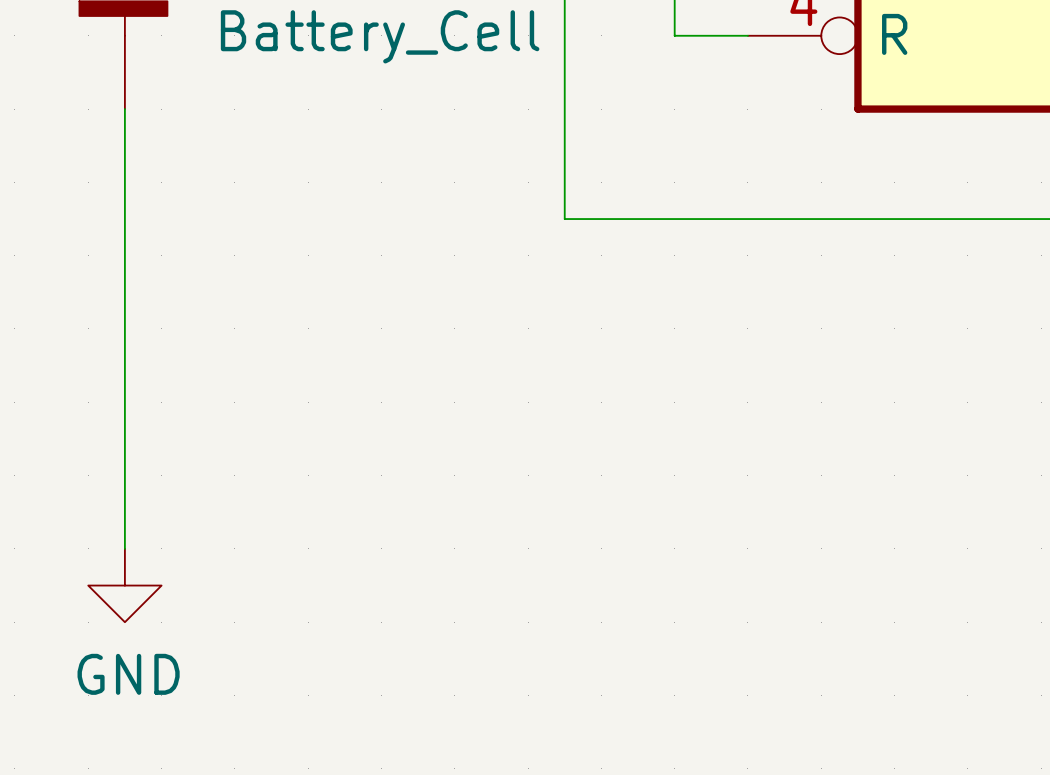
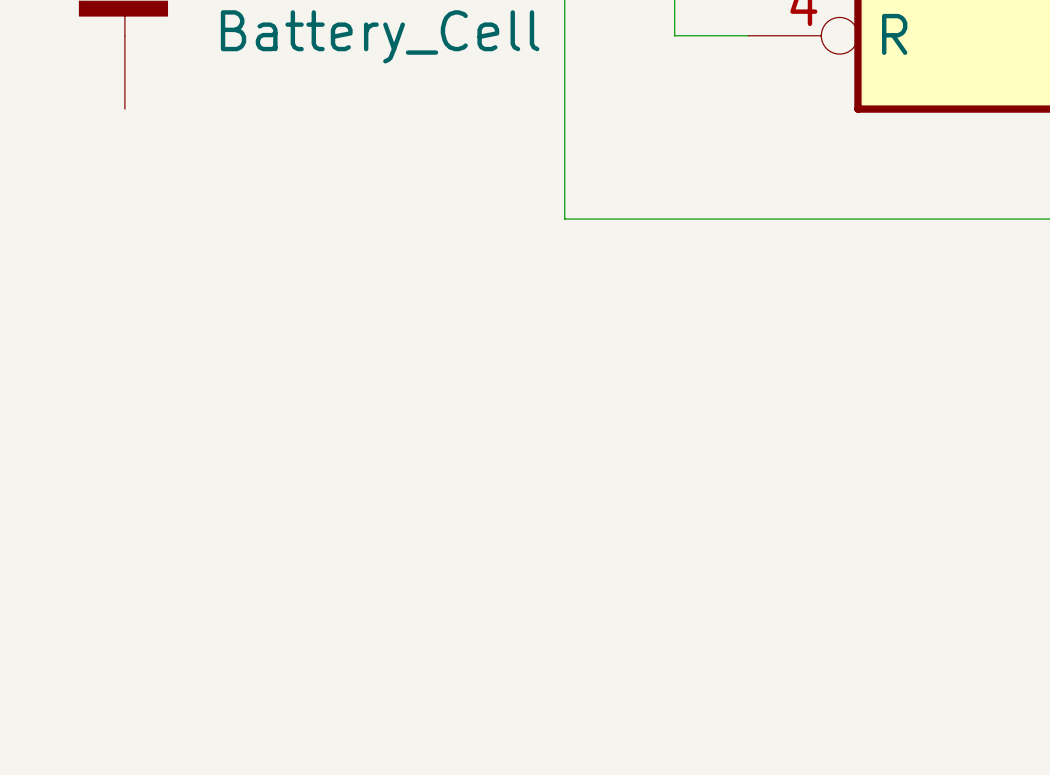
wire: (124, 109) (124, 548) -> none
power symbol: GND (124, 585) -> none

